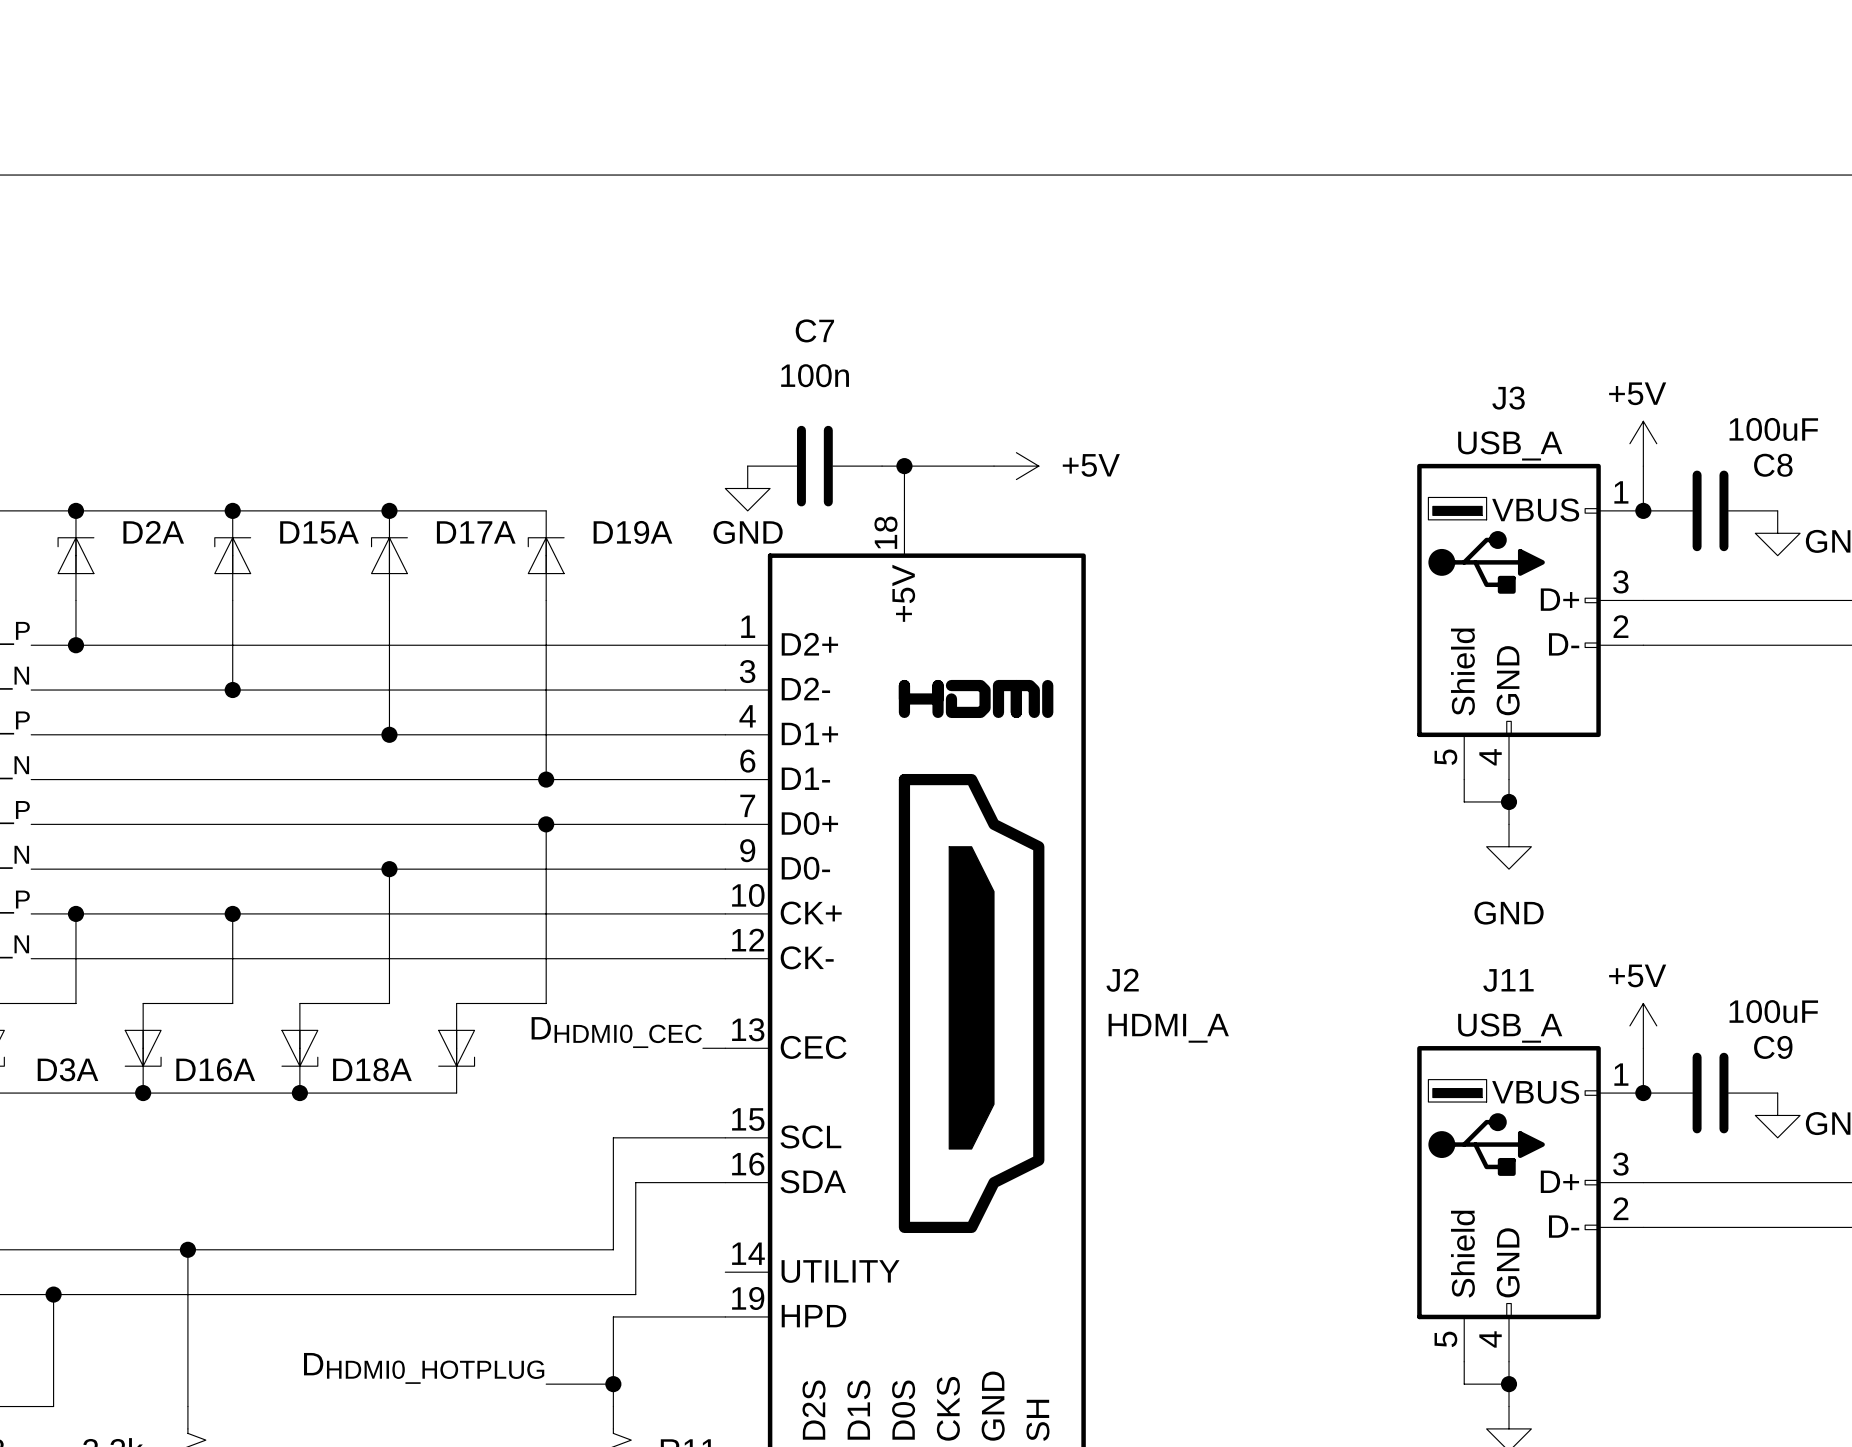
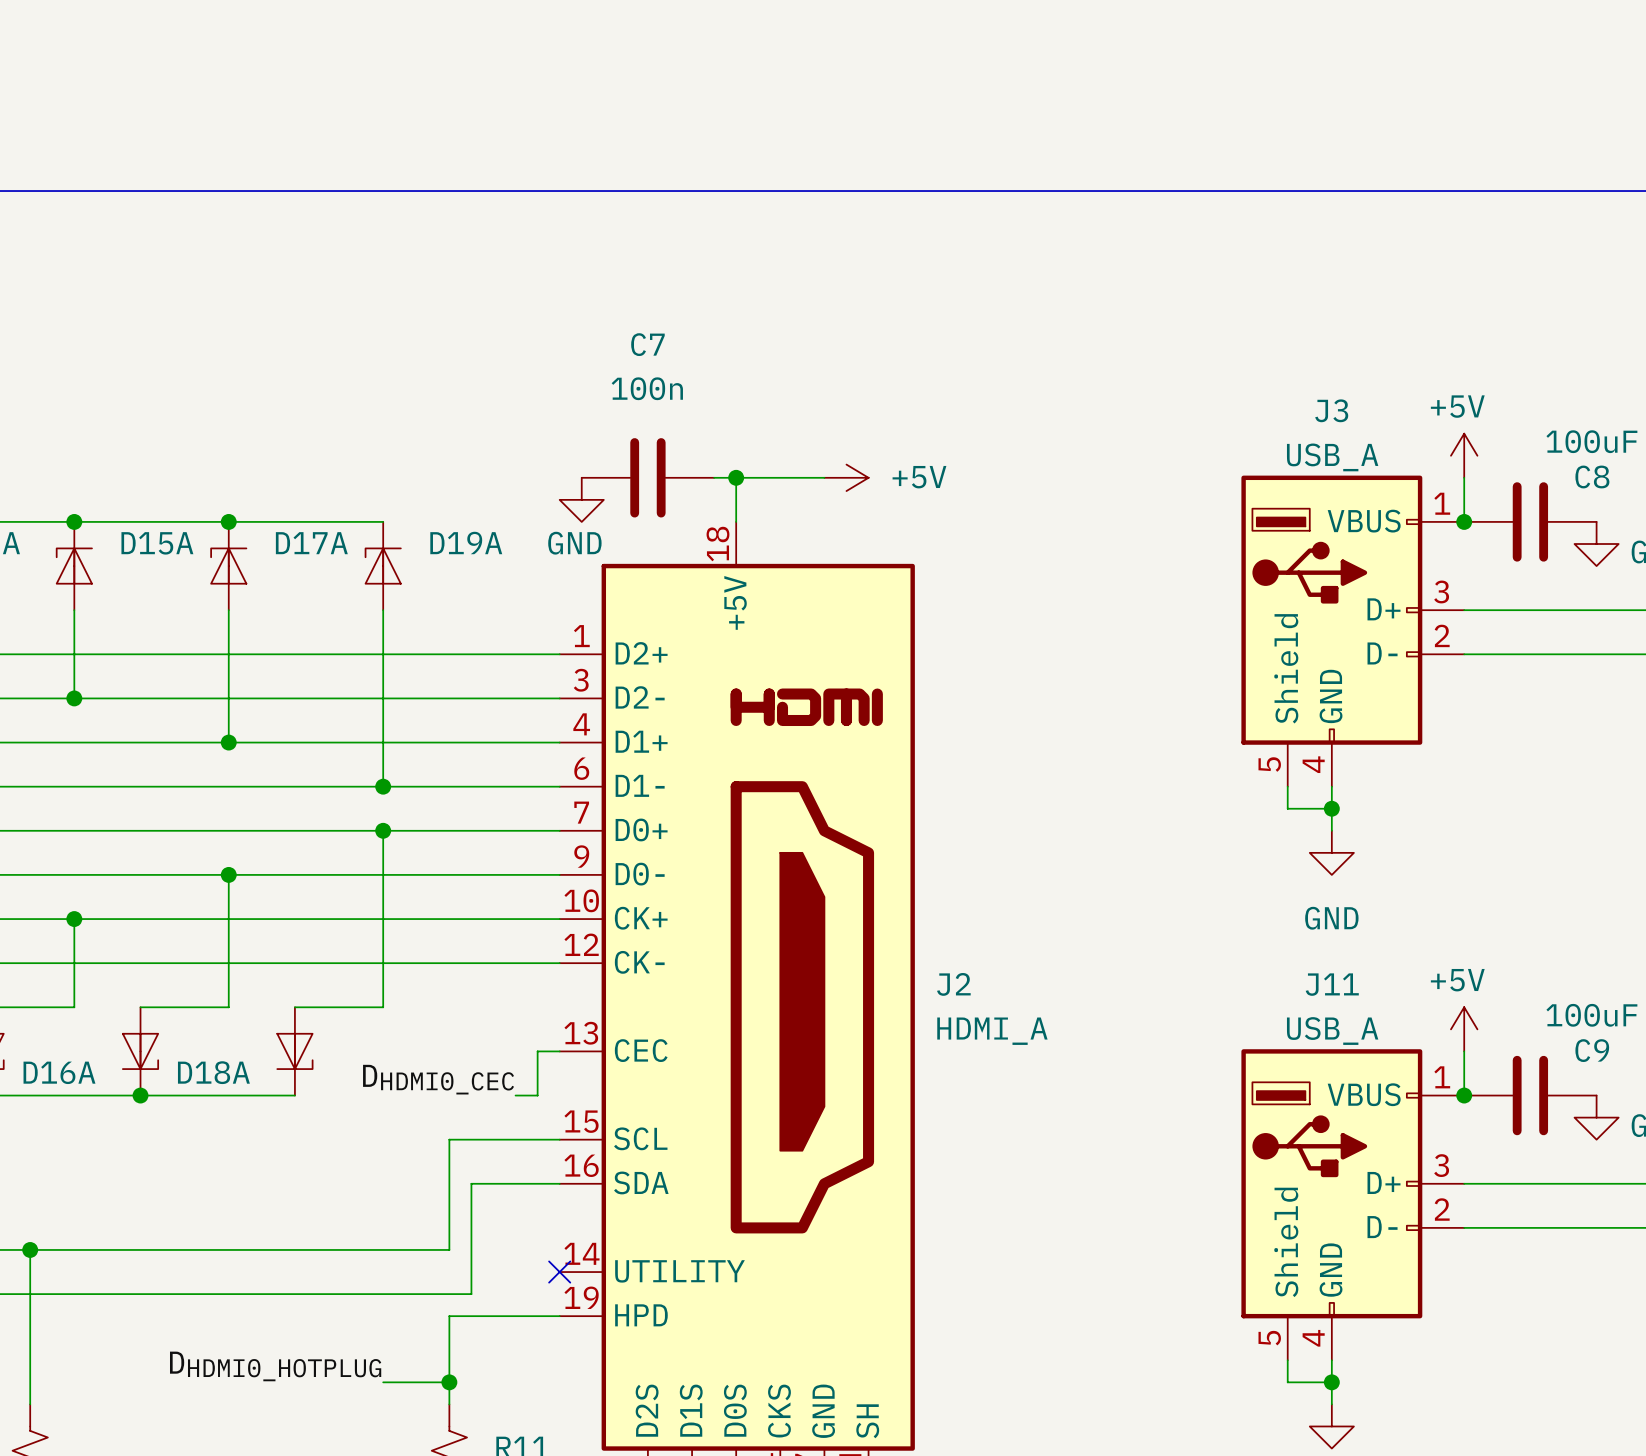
label position: DHDMI0_CEC (616, 1032) -> DHDMI0_CEC (438, 1079)
wire: none -> (537, 1051) (537, 1095) (515, 1095)
no-connect mark: none -> (559, 1272)

